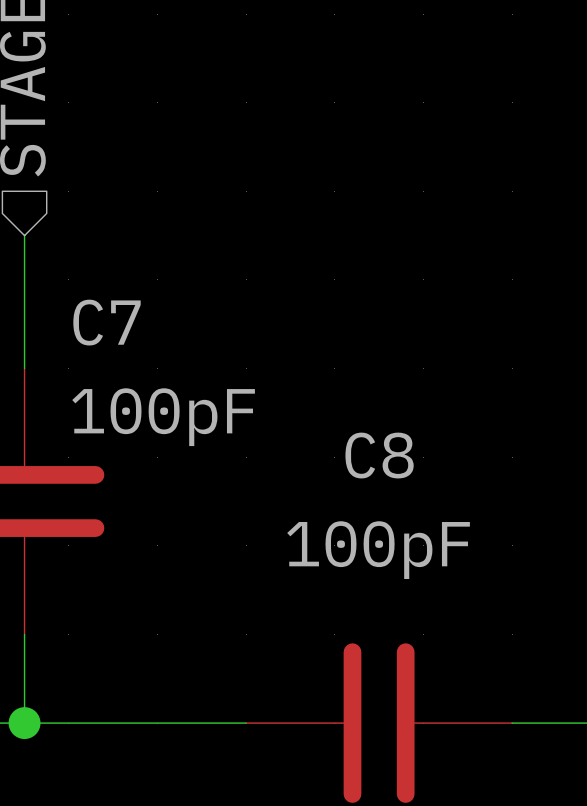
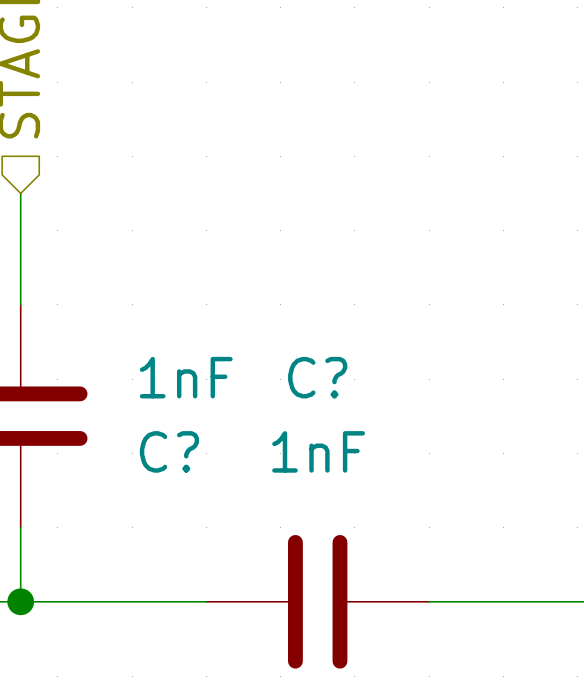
C7 name: C7 (107, 322) -> C? (169, 451)
C7 value: 100pF (163, 417) -> 1nF (186, 377)
C8 name: C8 (379, 455) -> C? (317, 377)
C8 value: 100pF (378, 550) -> 1nF (318, 451)

